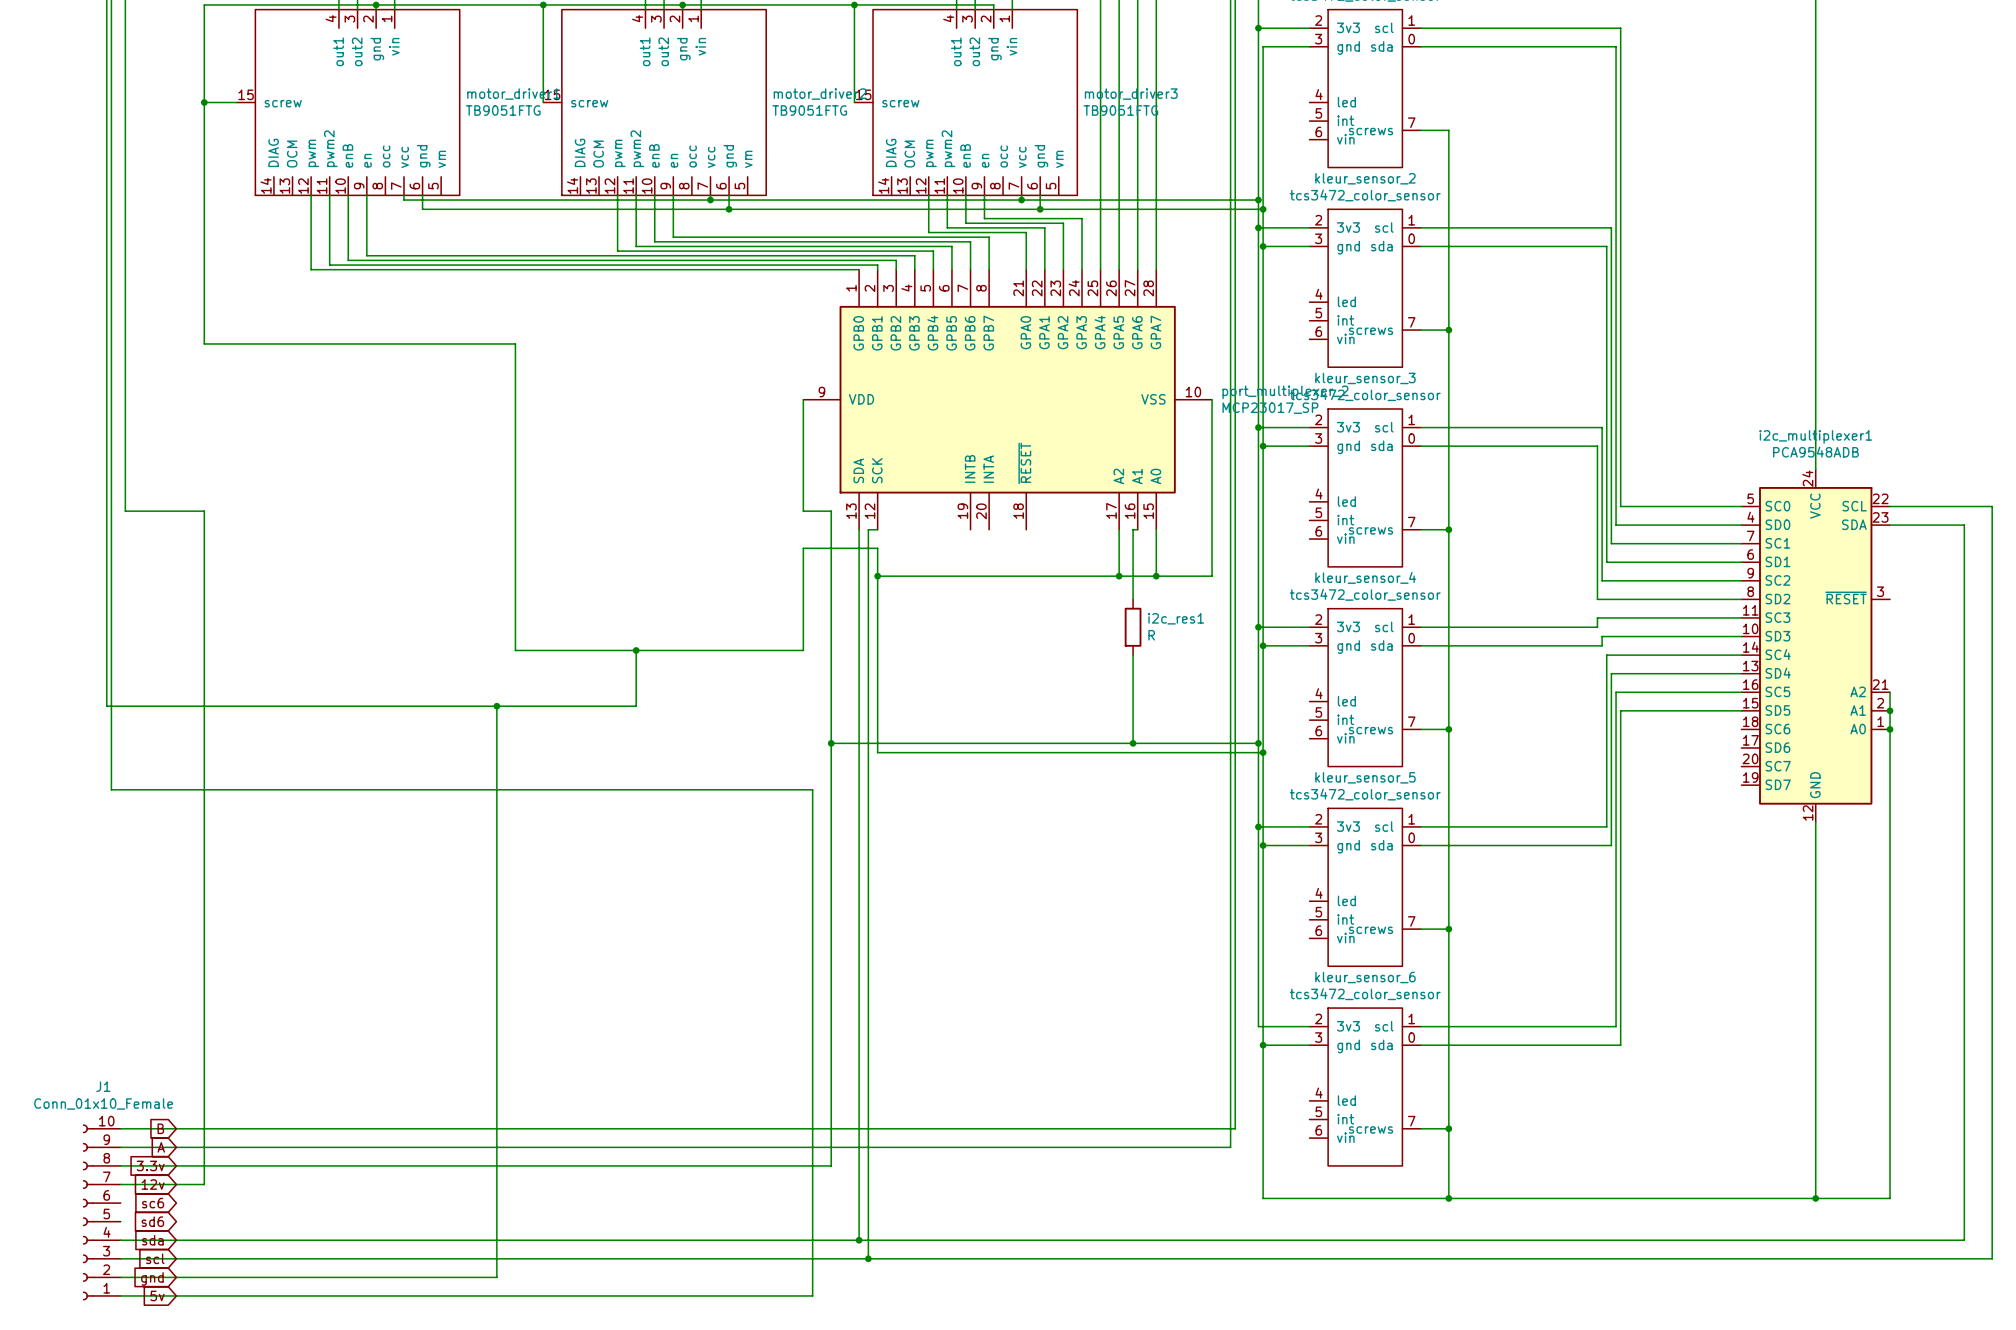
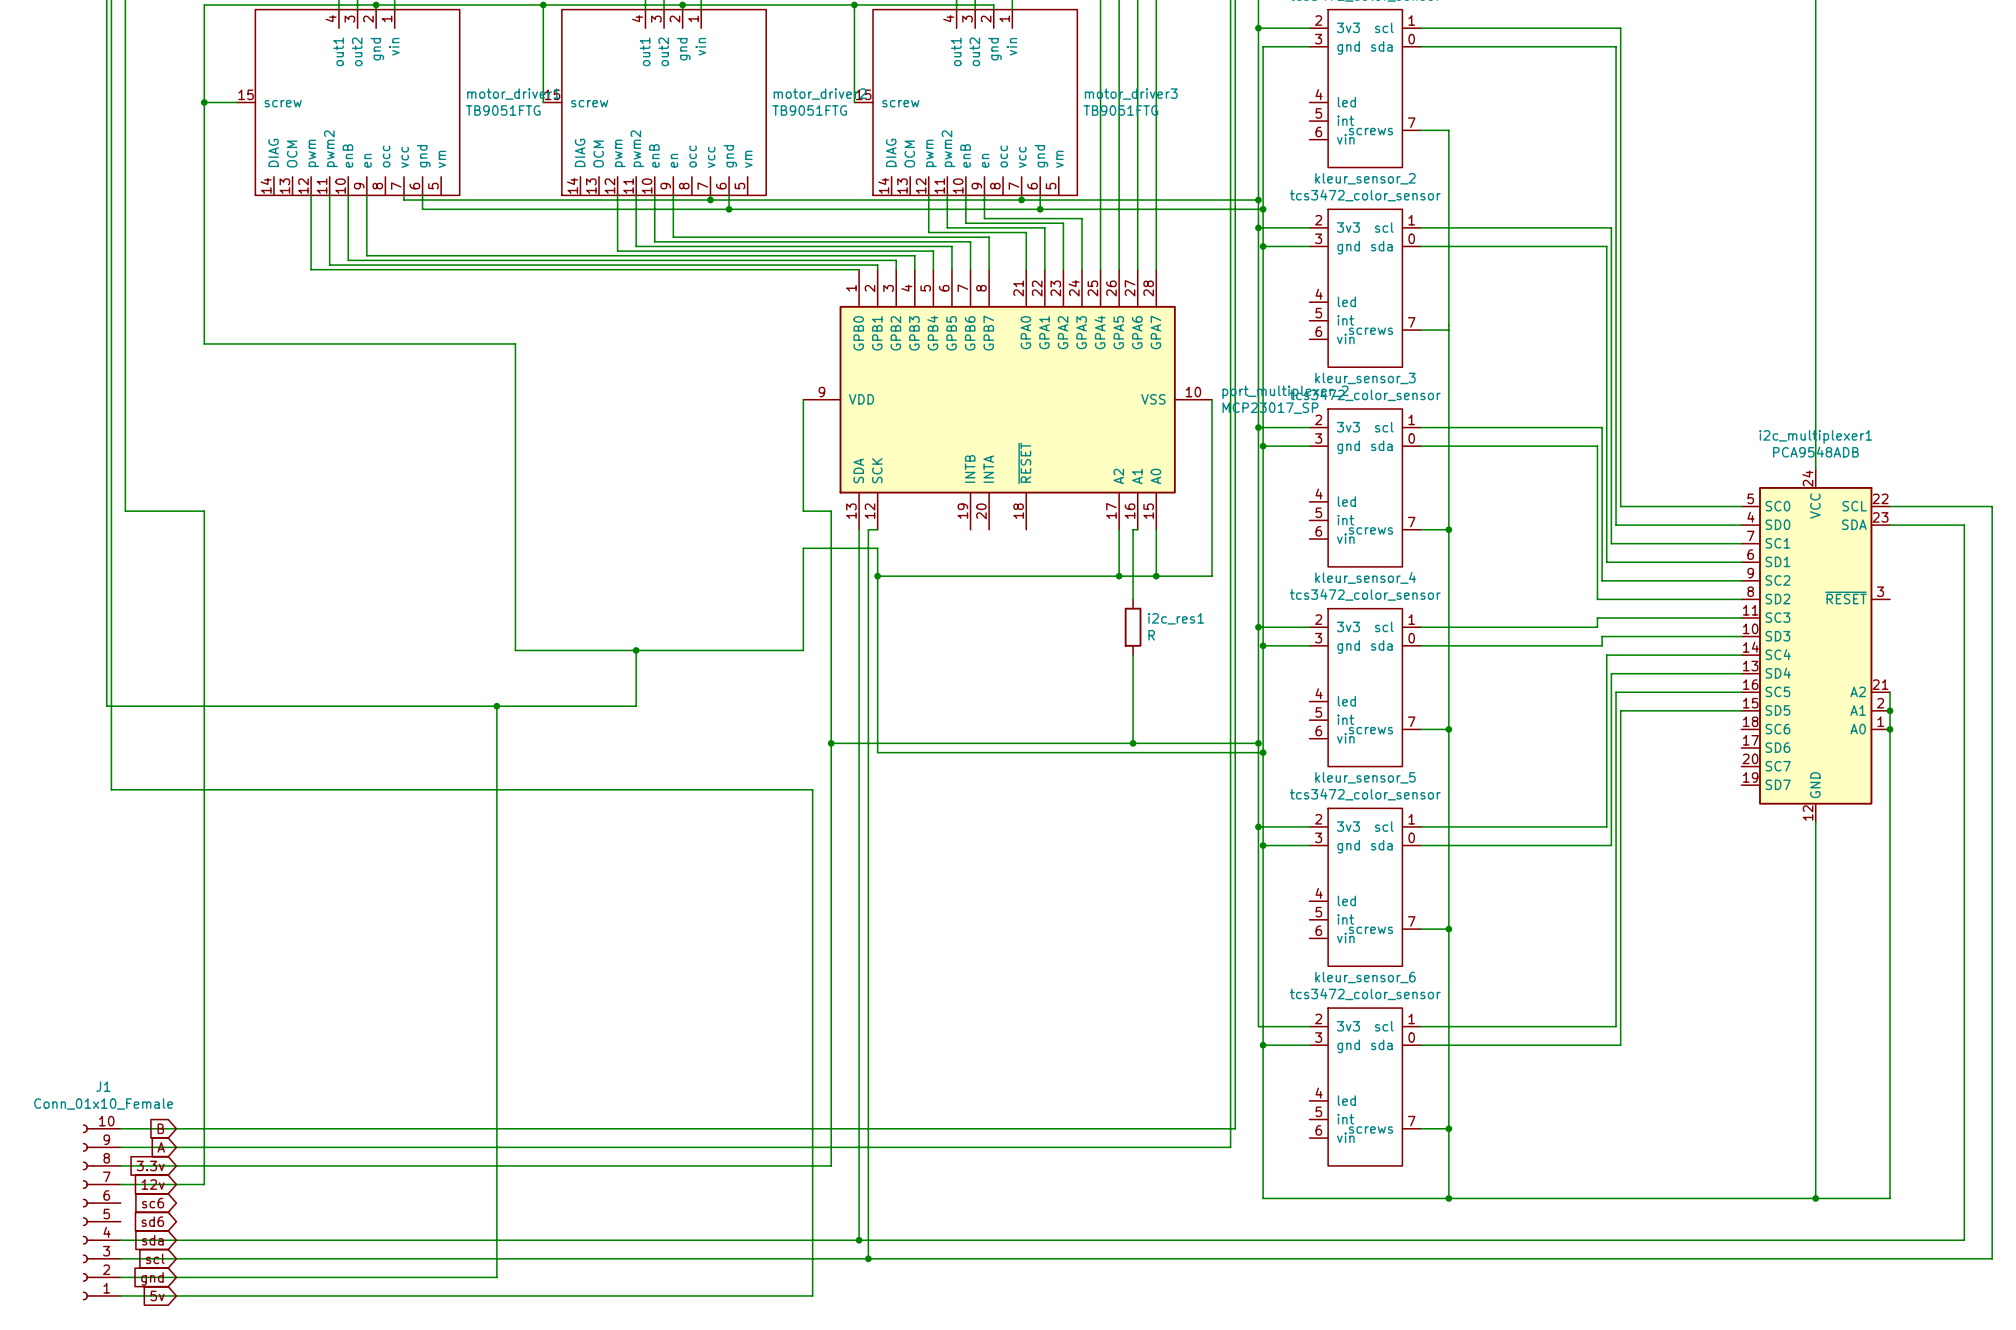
junction: (1448, 330) -> none

